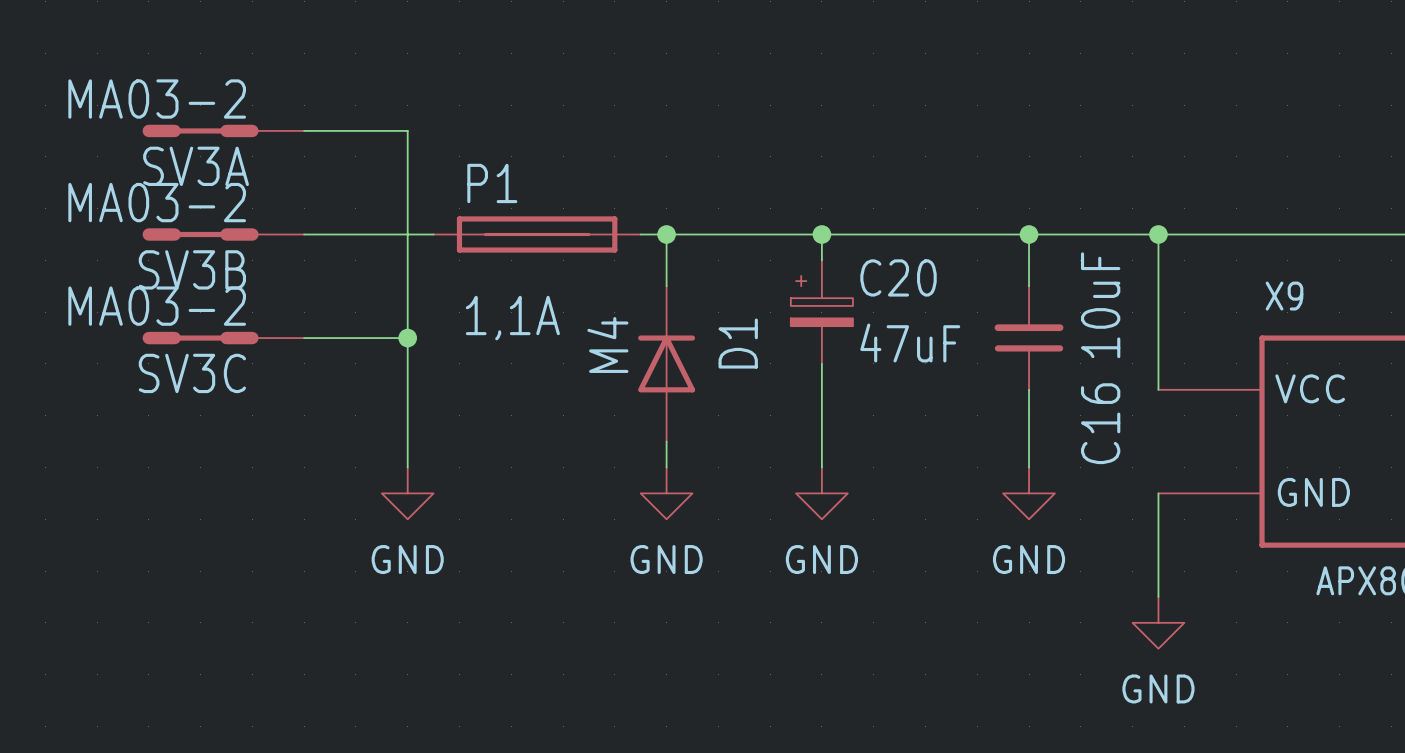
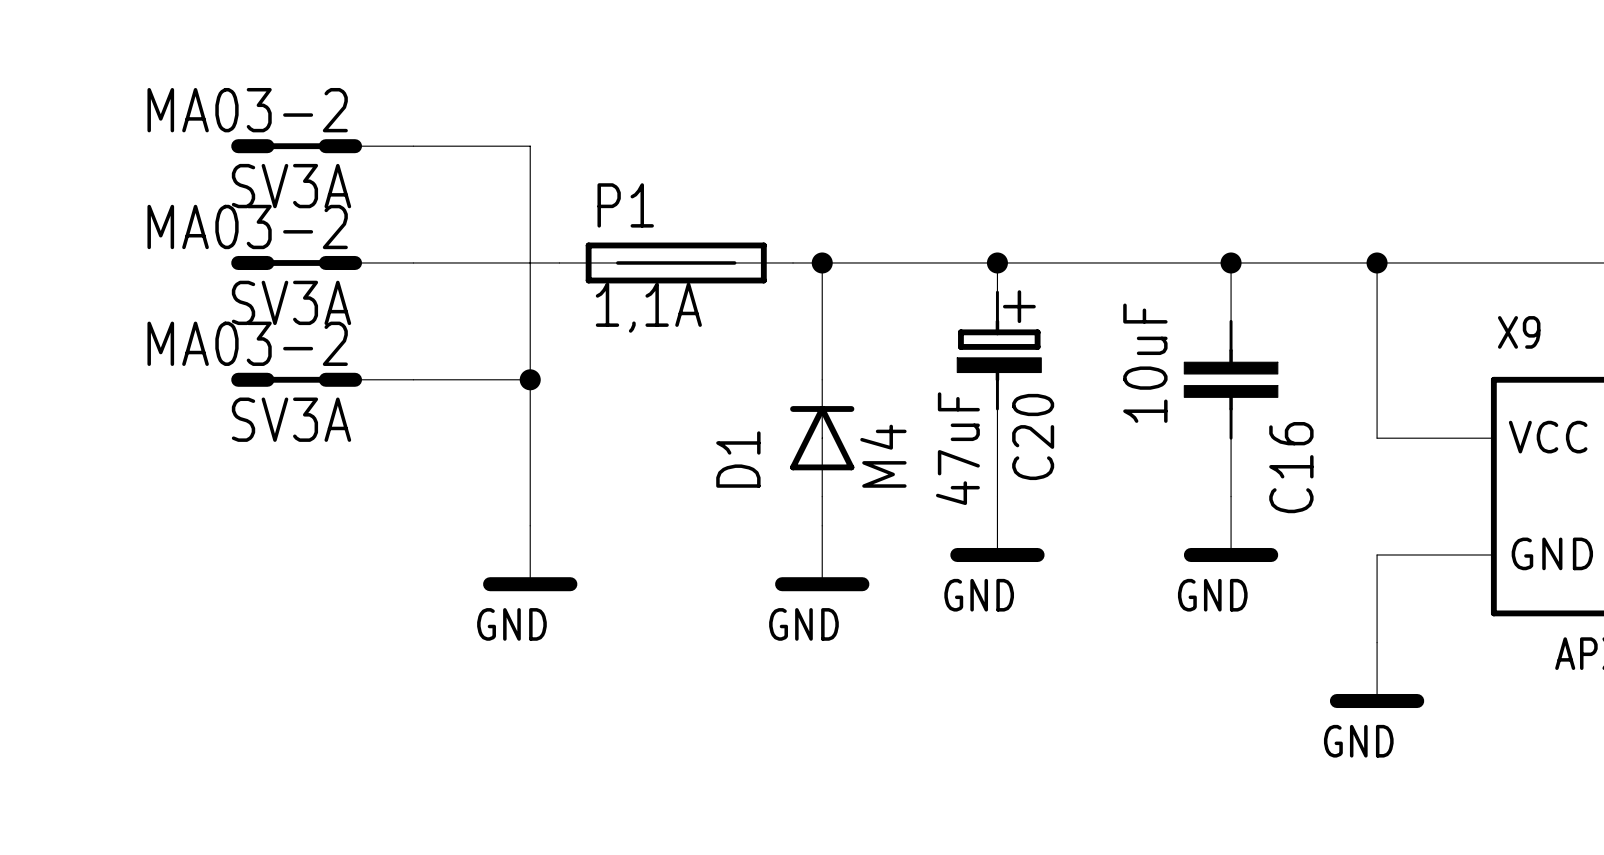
C20 symbol: [790, 260, 853, 364] -> [957, 290, 1042, 411]
SV3B name: SV3B (192, 269) -> SV3A (291, 302)
C20 name position: C20 (898, 277) -> C20 (1033, 436)
D1 symbol: [638, 286, 696, 442] -> [790, 379, 855, 497]
C16 symbol: [994, 286, 1064, 390] -> [1184, 319, 1278, 440]
C16 value position: 10uF (1100, 305) -> 10uF (1145, 363)
P1 value position: 1,1A (512, 318) -> 1,1A (648, 307)
D1 name position: D1 (738, 343) -> D1 (738, 459)
C20 value position: 47uF (910, 343) -> 47uF (957, 448)
D1 value position: M4 (607, 345) -> M4 (883, 456)
SV3C name: SV3C (192, 373) -> SV3A (291, 419)
power symbol shape: [381, 467, 434, 520] -> [483, 525, 578, 592]
power symbol shape: [640, 467, 693, 520] -> [775, 525, 870, 592]
power symbol: none -> (997, 529)
power symbol: none -> (1231, 529)
power symbol: GND (821, 493) -> none
power symbol: GND (1029, 493) -> none
power symbol text: GND (407, 559) -> none
power symbol text: GND (666, 559) -> none
power symbol: none -> (1377, 675)
power symbol: GND (1158, 622) -> none

